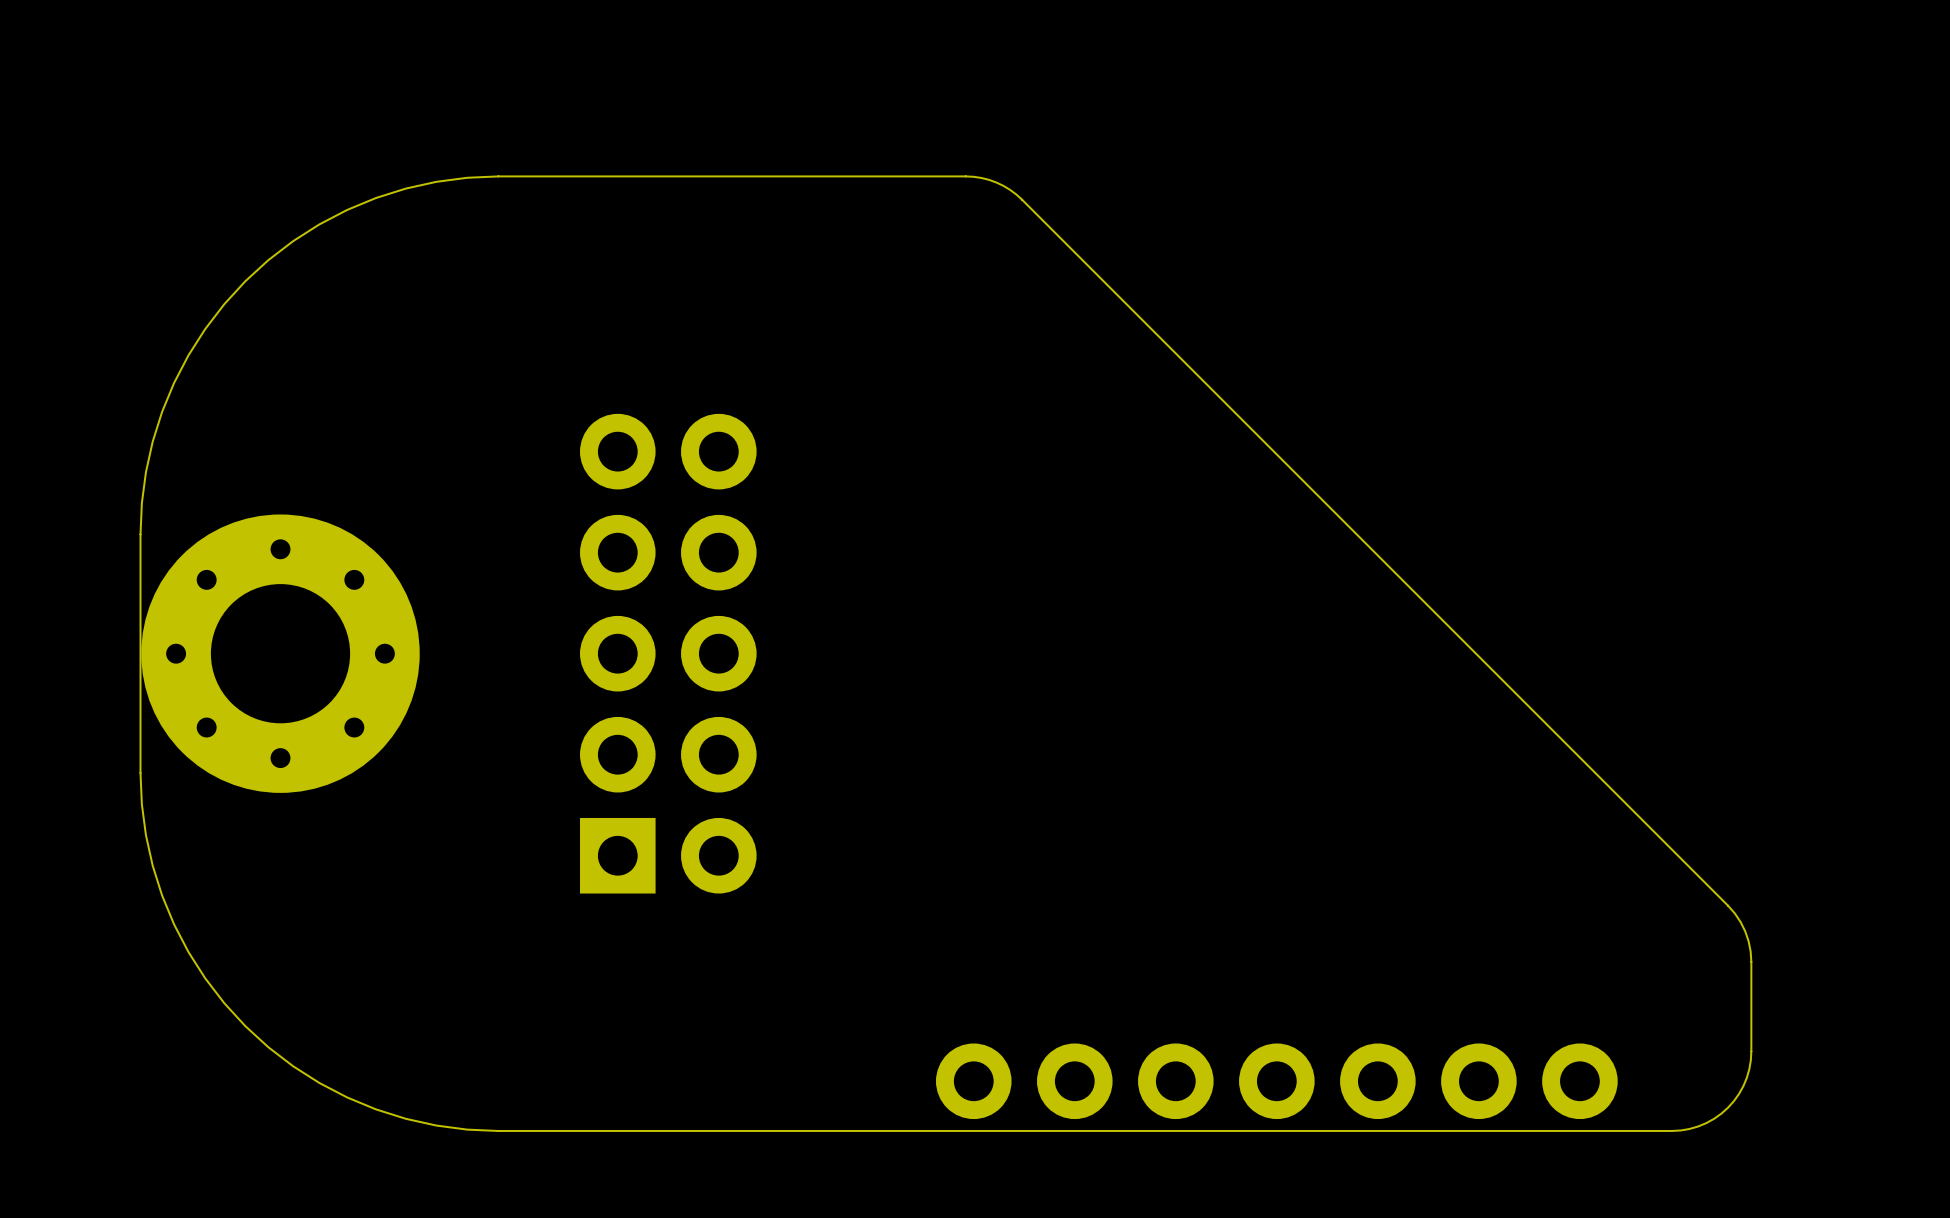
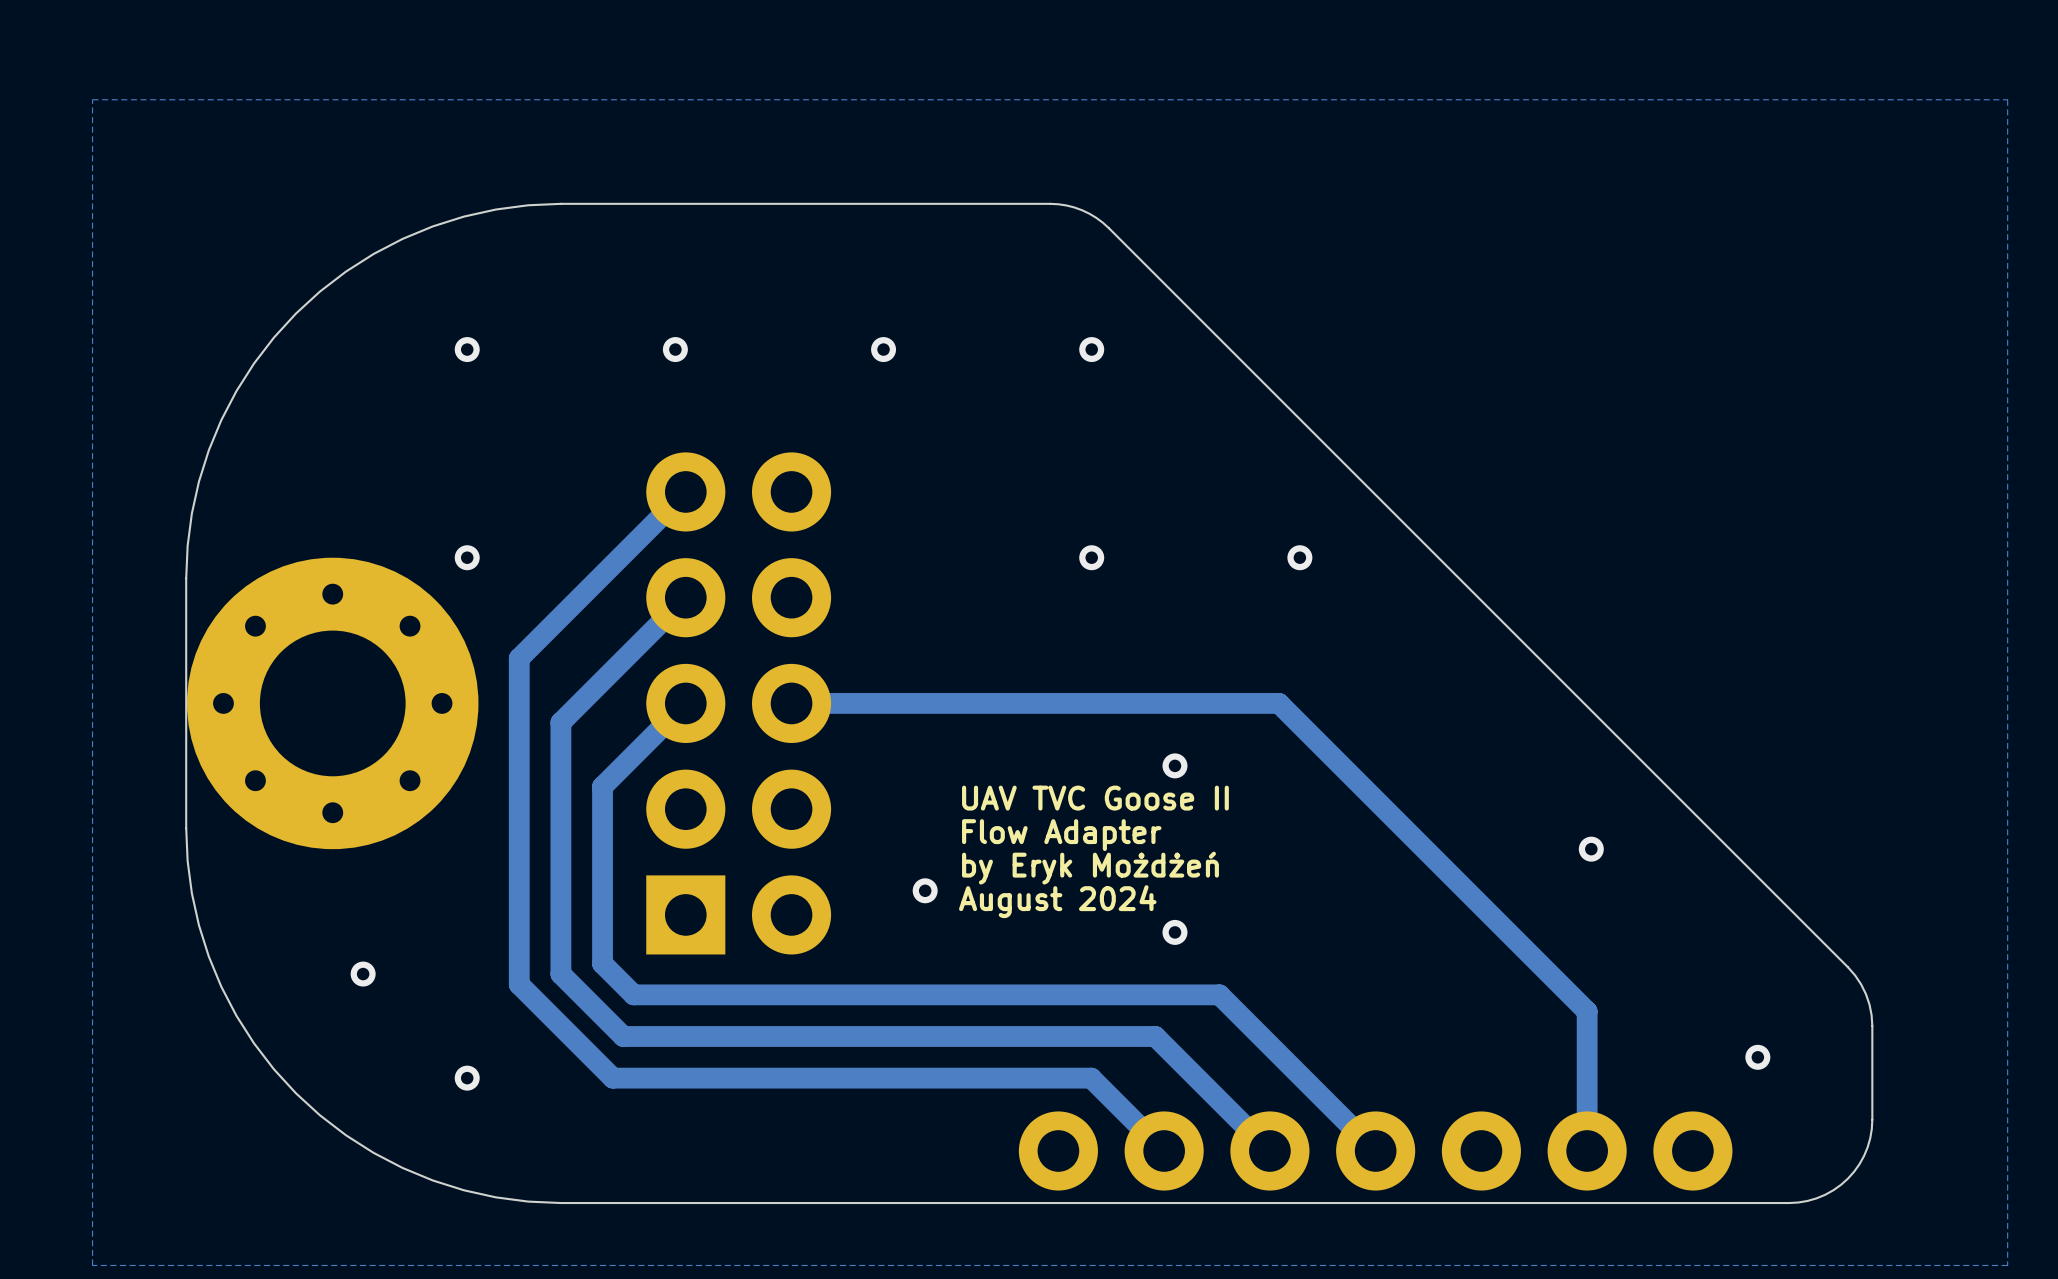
zone outline: none -> (2007, 99) (2007, 1265) (92, 1265) (92, 99) (2007, 99)
via: none -> (467, 349)
via: none -> (675, 349)
via: none -> (883, 349)
via: none -> (1091, 349)
track: none -> (685, 491) (519, 658) (519, 984) (612, 1078) (1091, 1078) (1164, 1150)
via: none -> (467, 557)
via: none -> (1091, 557)
via: none -> (1299, 557)
track: none -> (685, 597) (560, 722) (560, 974) (623, 1036) (1155, 1036) (1269, 1150)
track: none -> (685, 703) (602, 786) (602, 963) (633, 994) (1219, 994) (1375, 1150)
track: none -> (791, 703) (1279, 703) (1587, 1011) (1587, 1150)
via: none -> (1174, 765)
text: none -> UAV TVC Goose II (1095, 798)
text: none -> Flow Adapter (1061, 835)
via: none -> (1591, 849)
text: none -> by Eryk Możdżeń (1090, 868)
via: none -> (925, 890)
text: none -> August 2024 (1057, 901)
via: none -> (1174, 932)
via: none -> (363, 974)
via: none -> (1757, 1057)
via: none -> (467, 1078)

